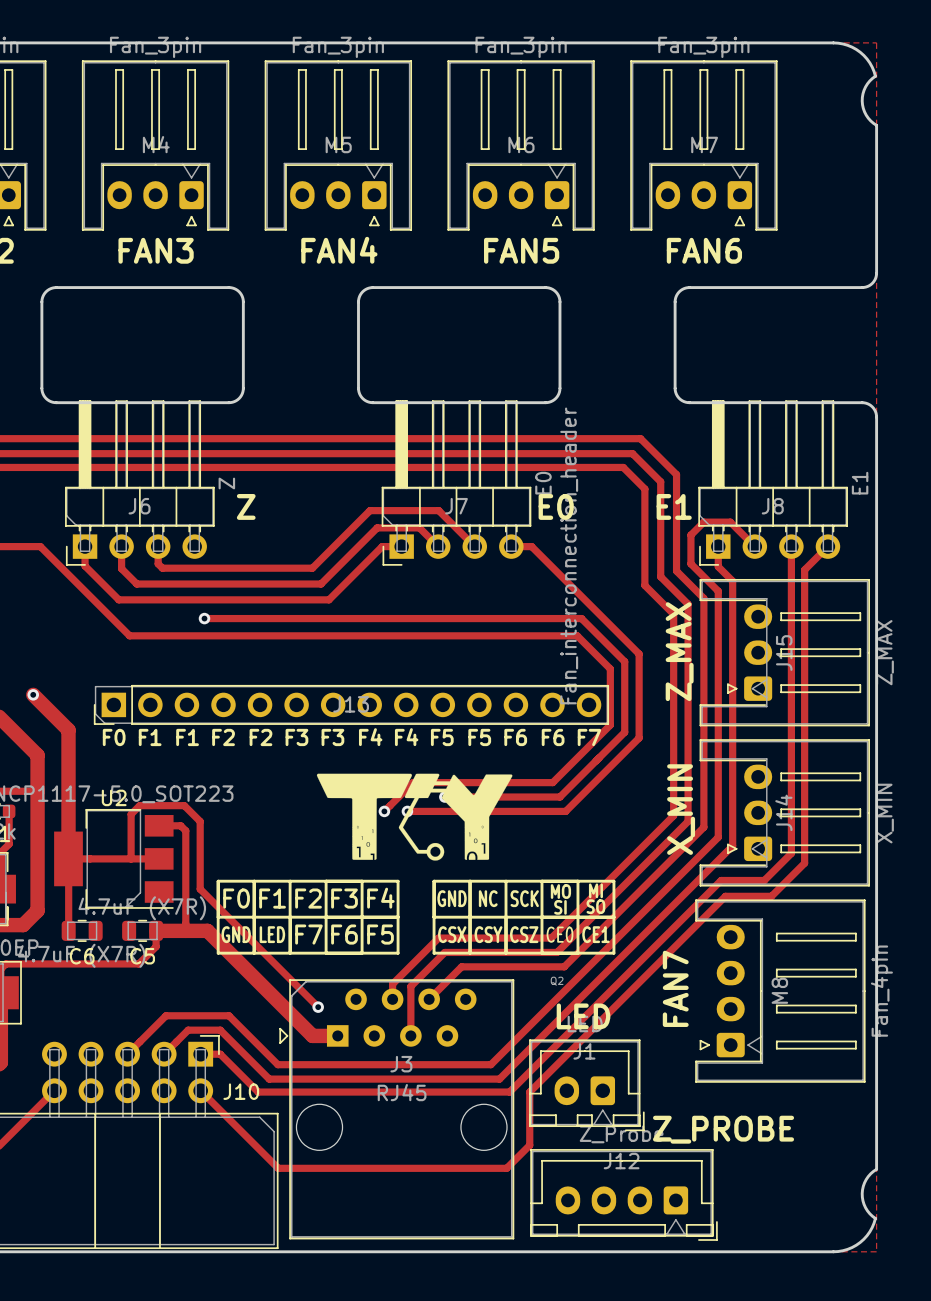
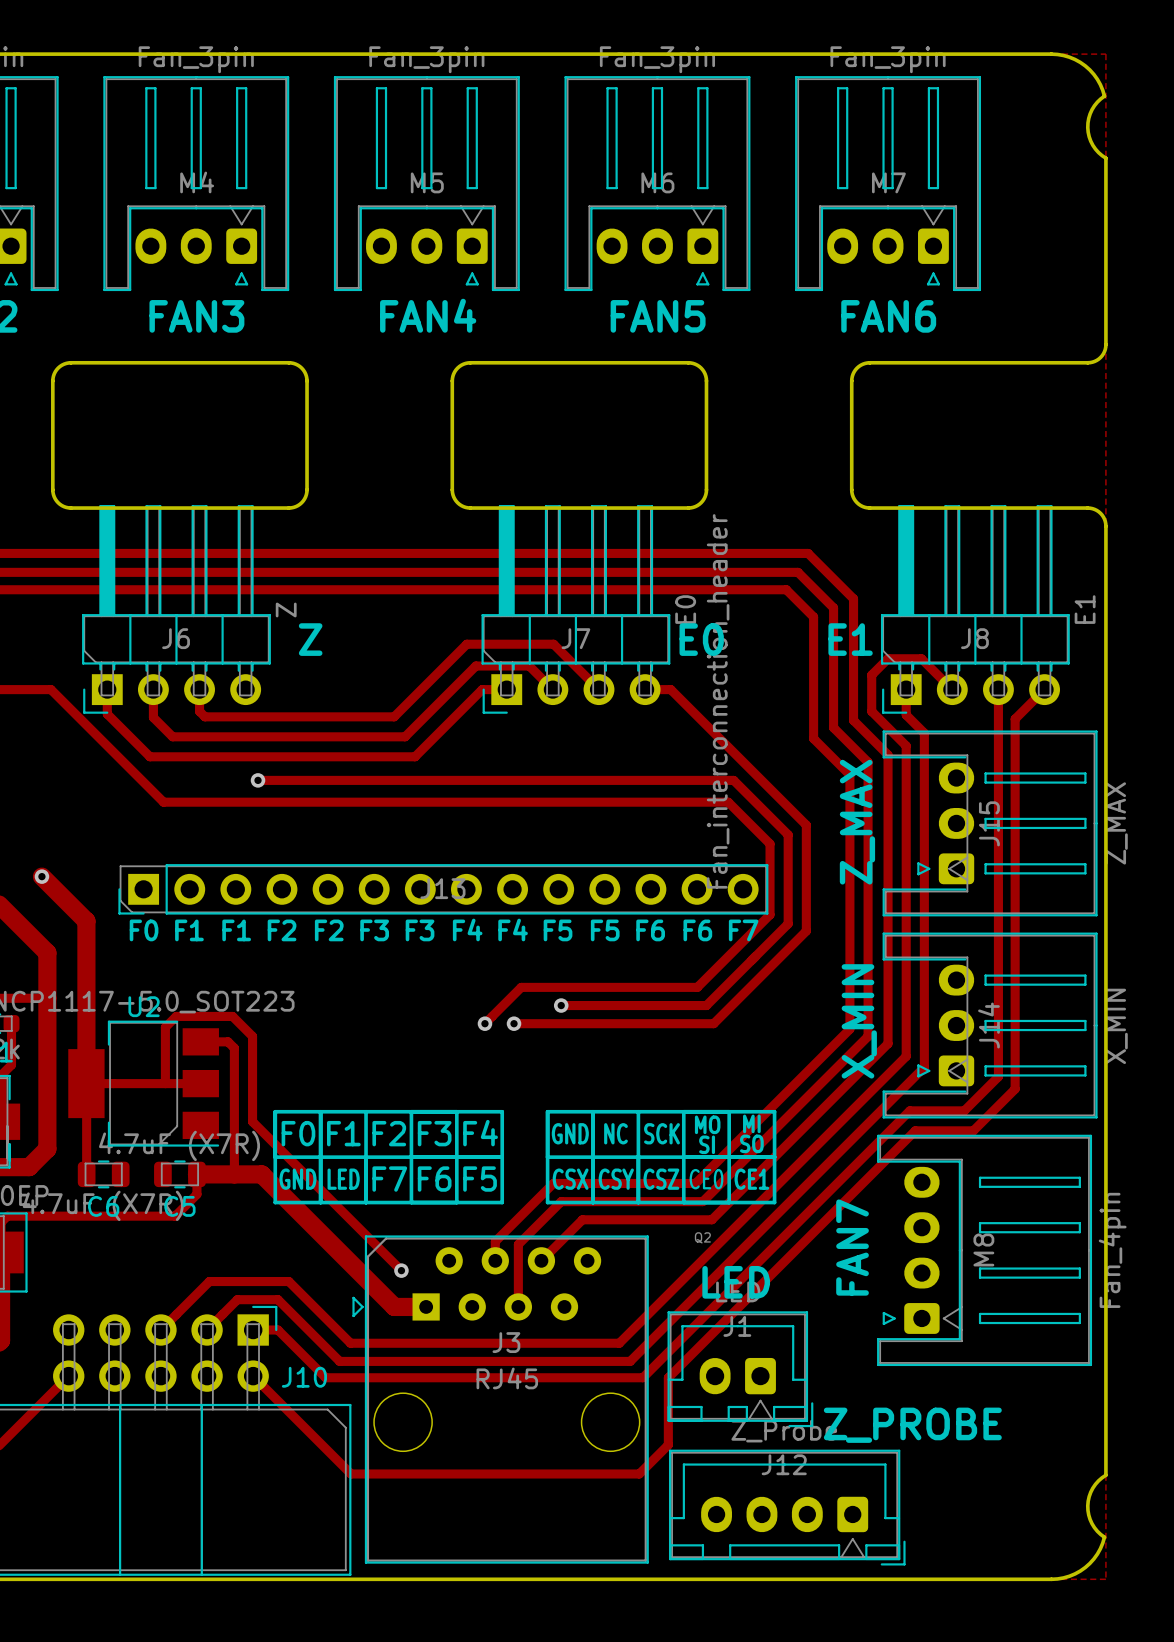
drawing: [316, 773, 513, 861] -> none

